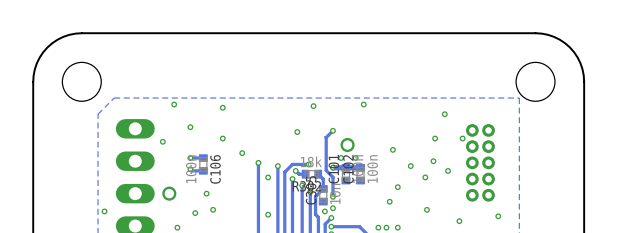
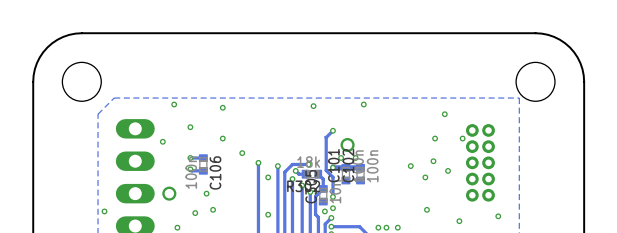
via: (297, 132) -> none
via: (392, 149) -> none
via: (397, 187) -> none
via: (389, 201) -> none

